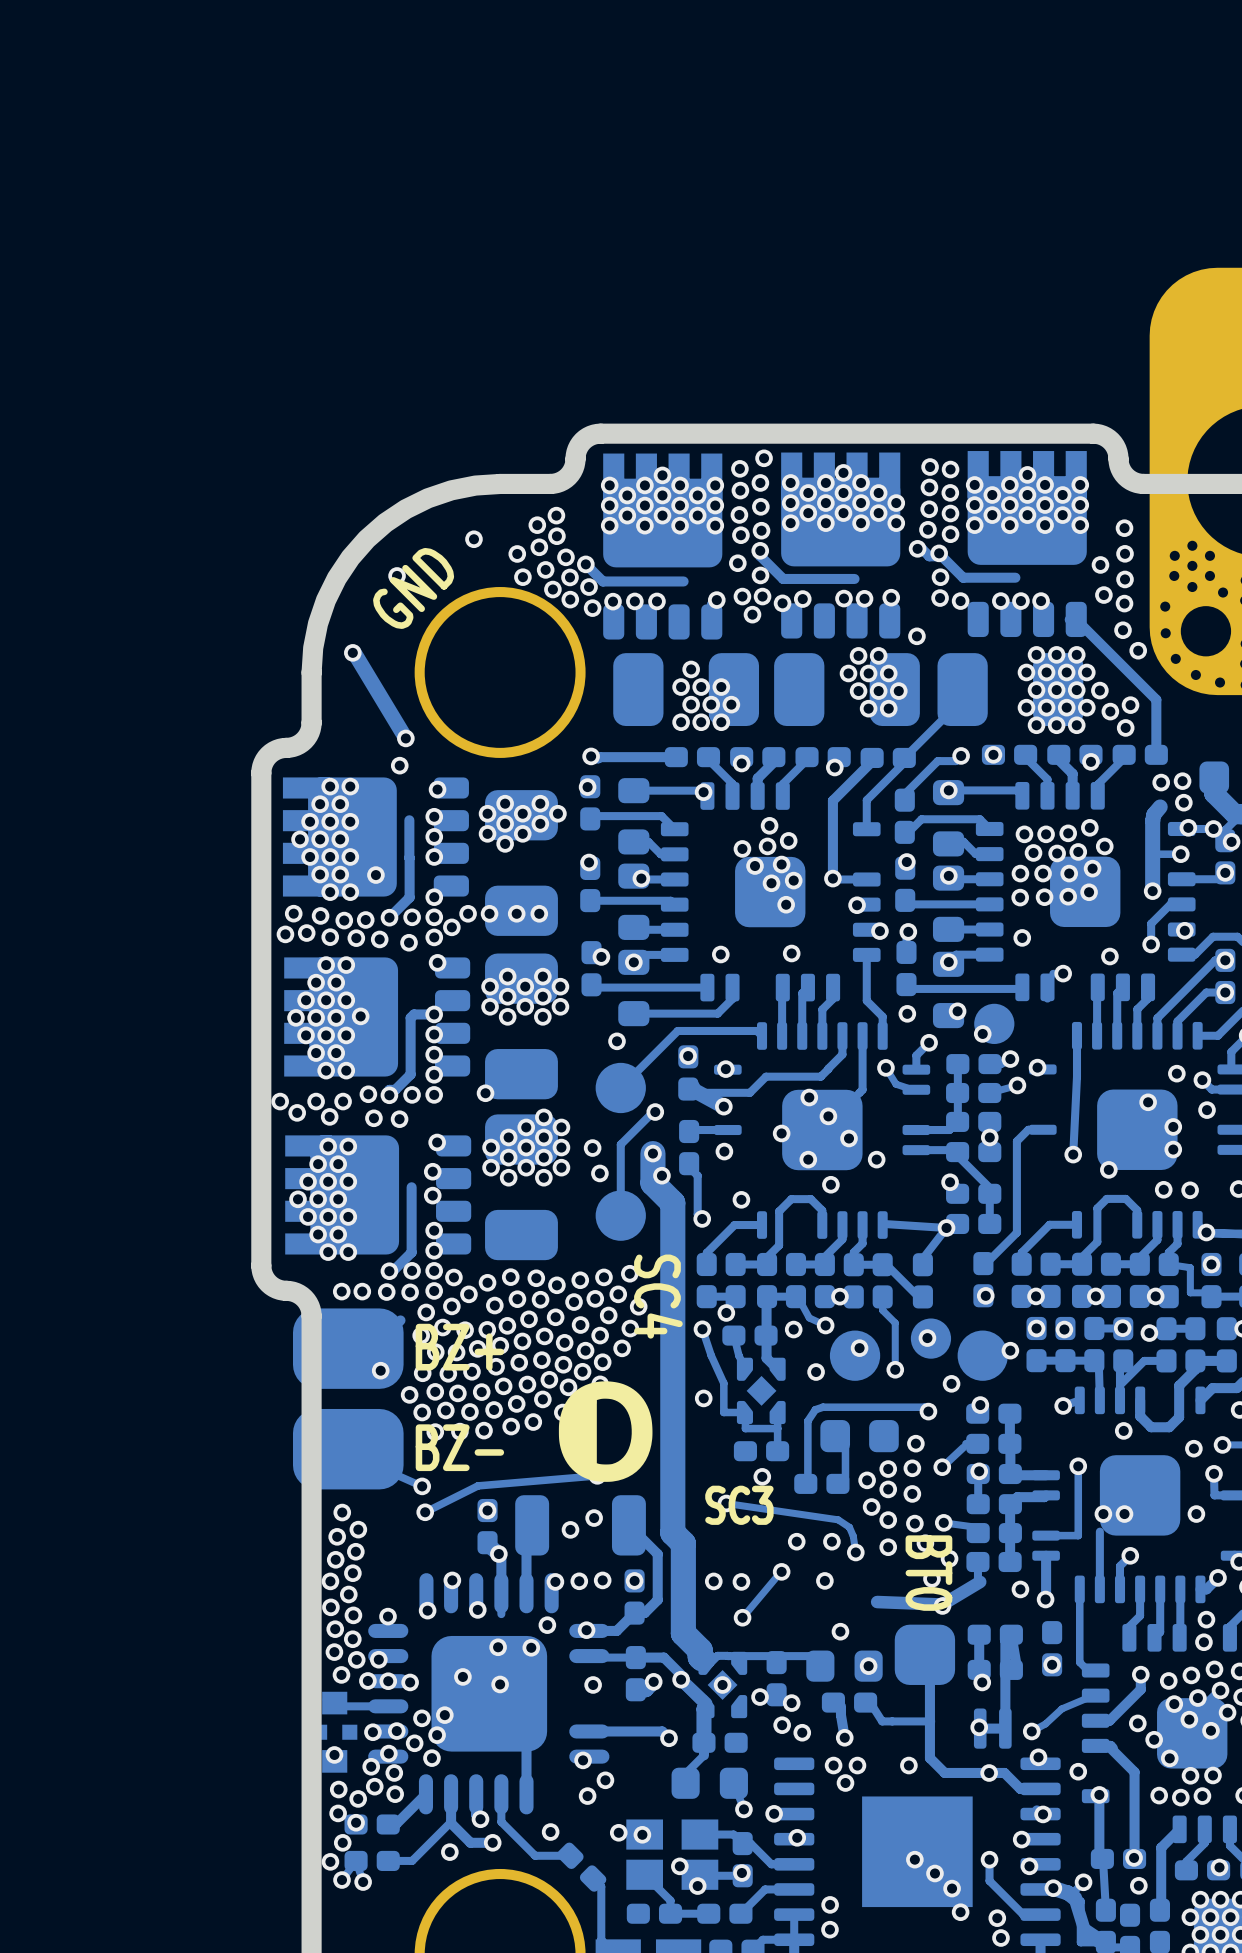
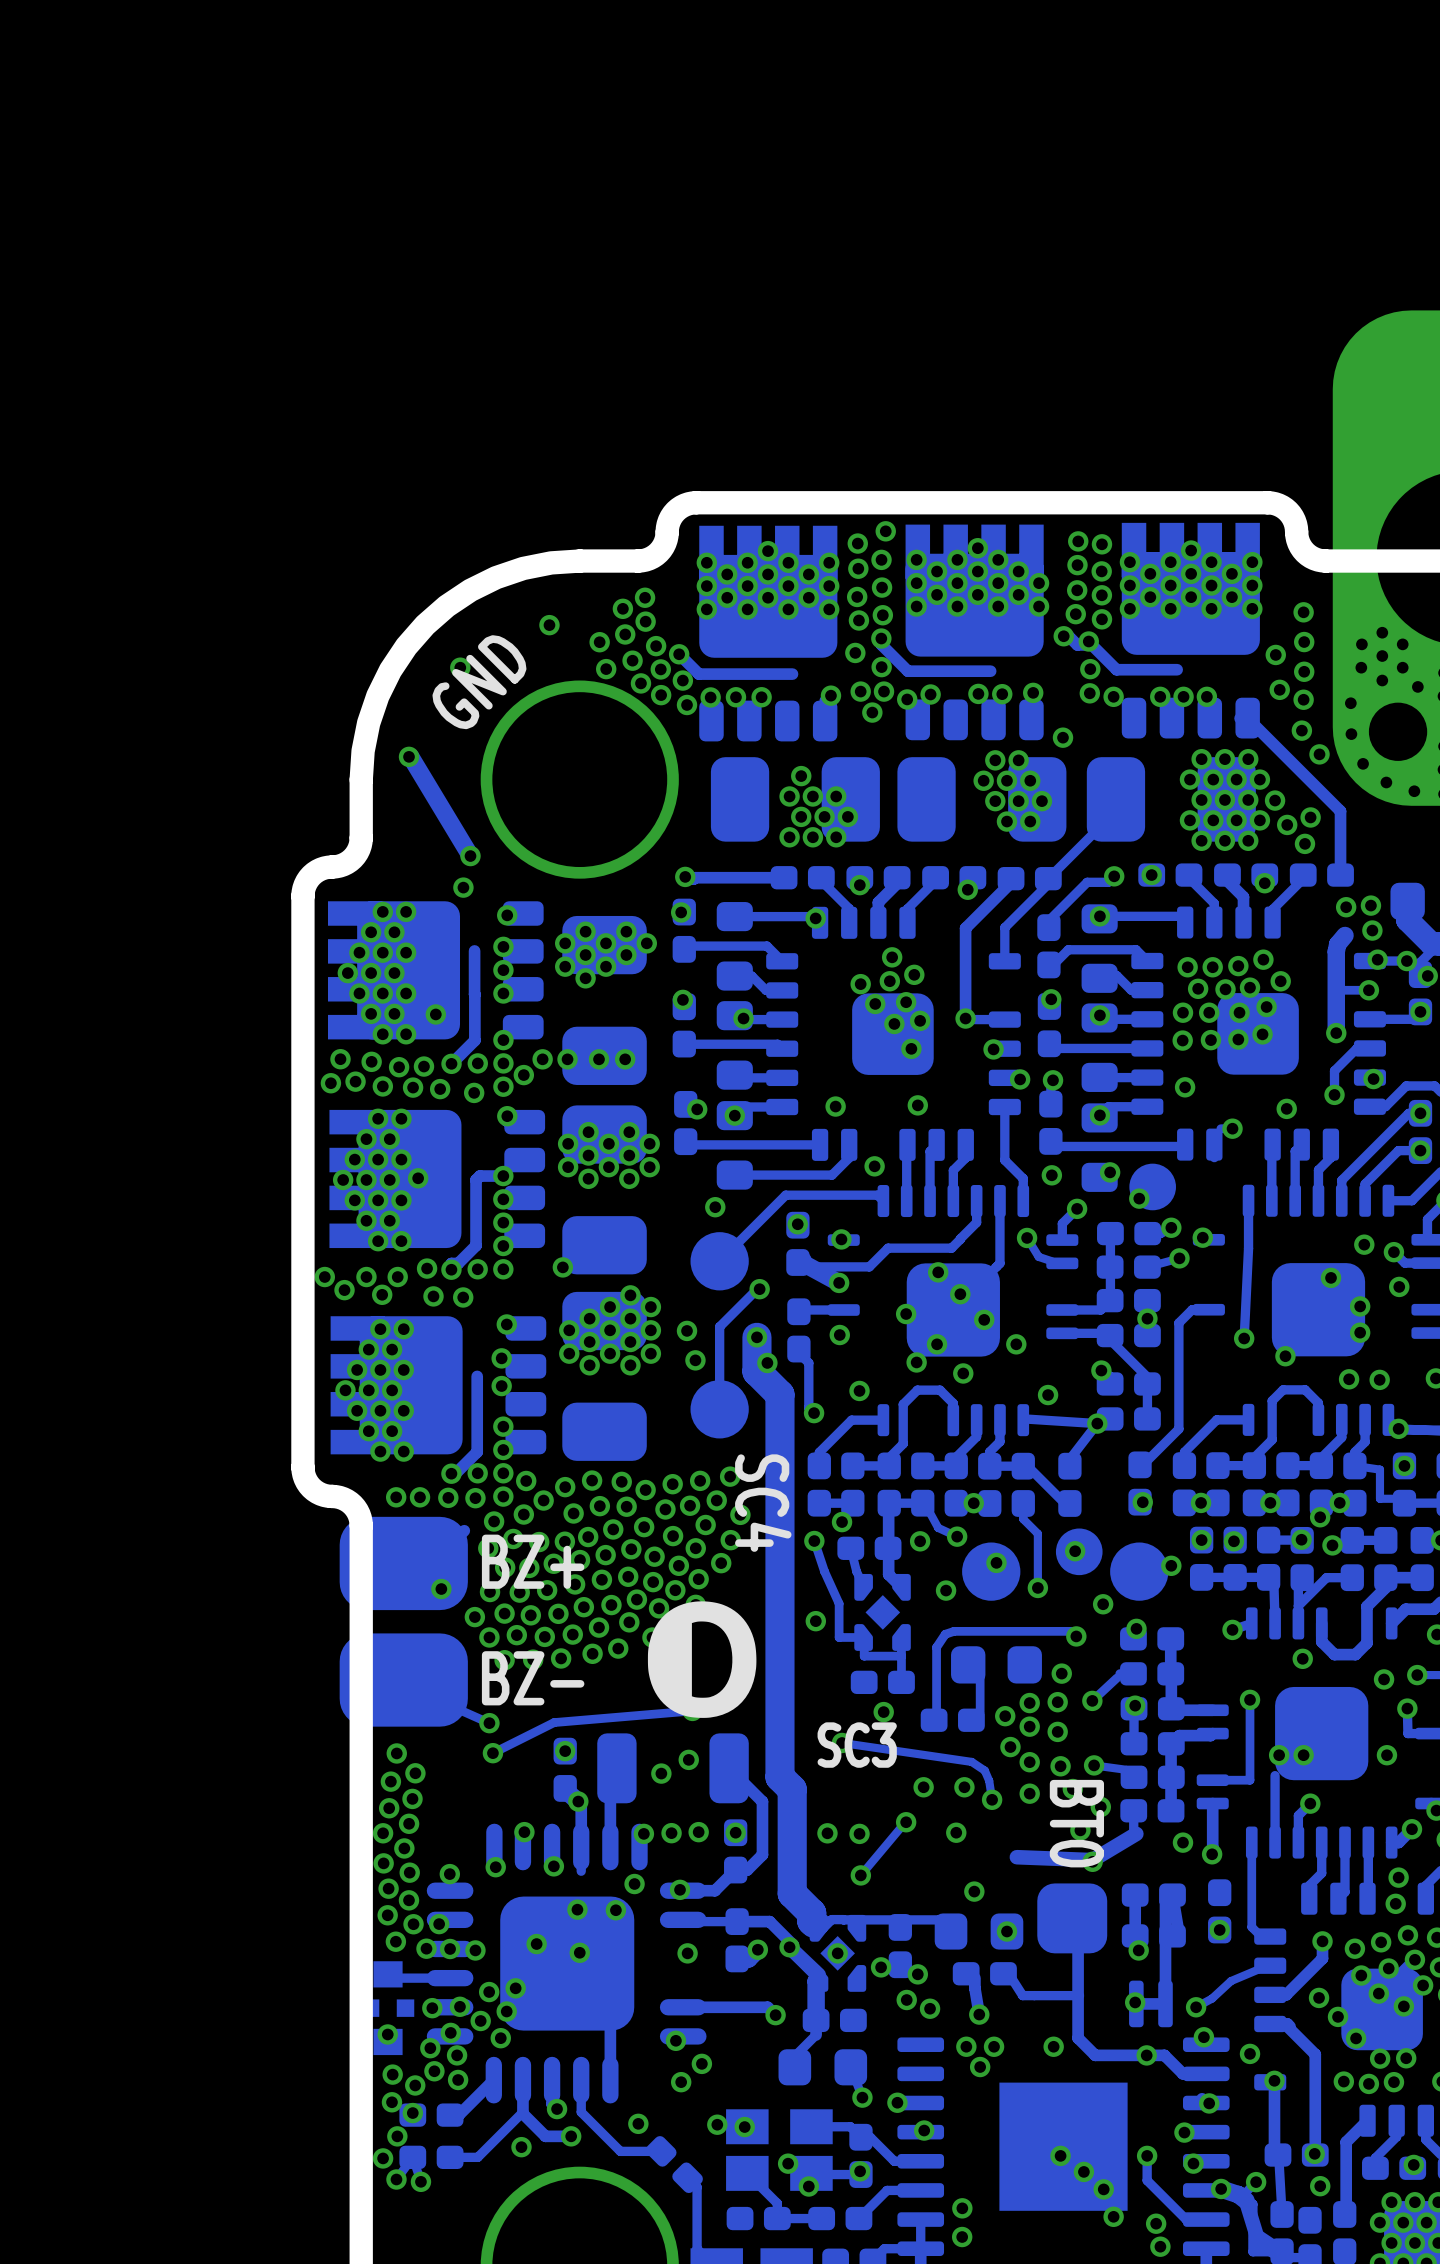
via: none -> (874, 1166)
via: none -> (916, 1362)
via: none -> (1048, 1395)
via: none -> (1320, 1517)

